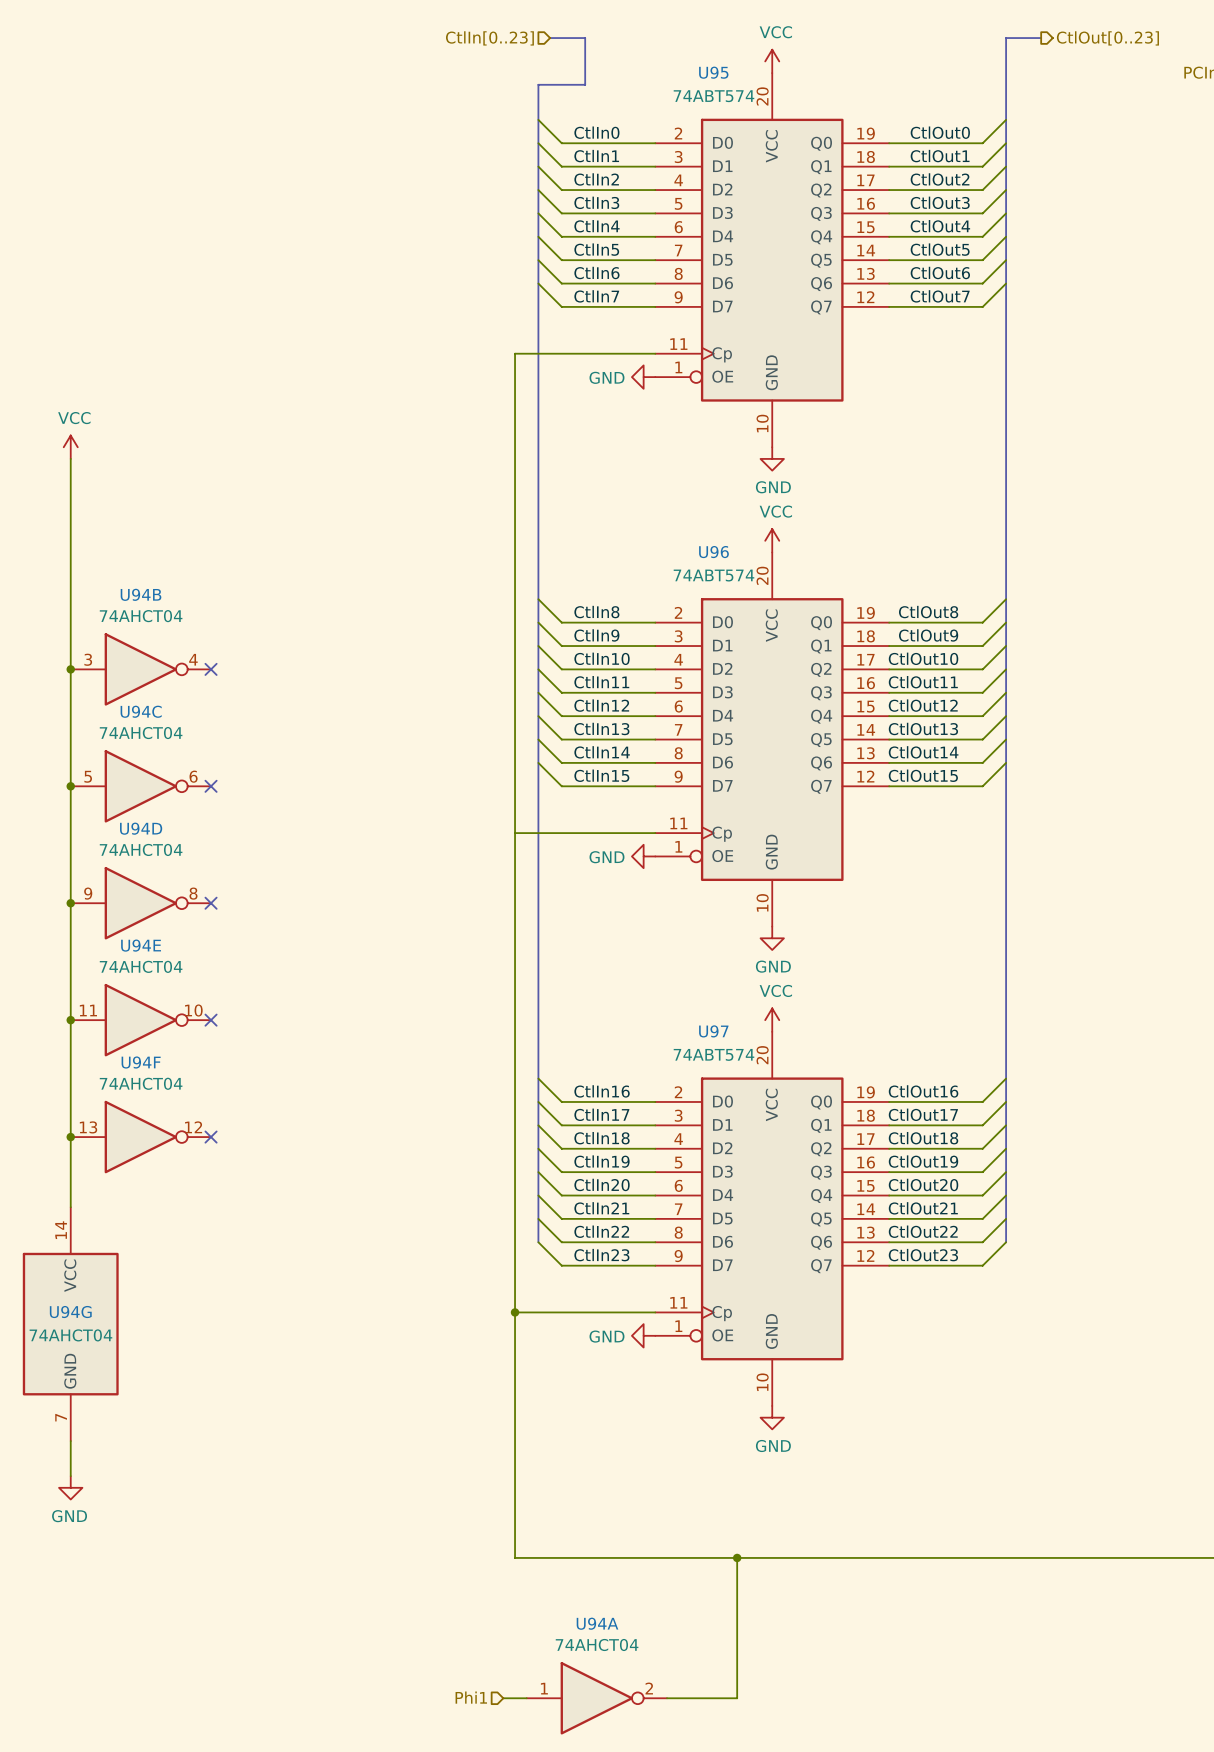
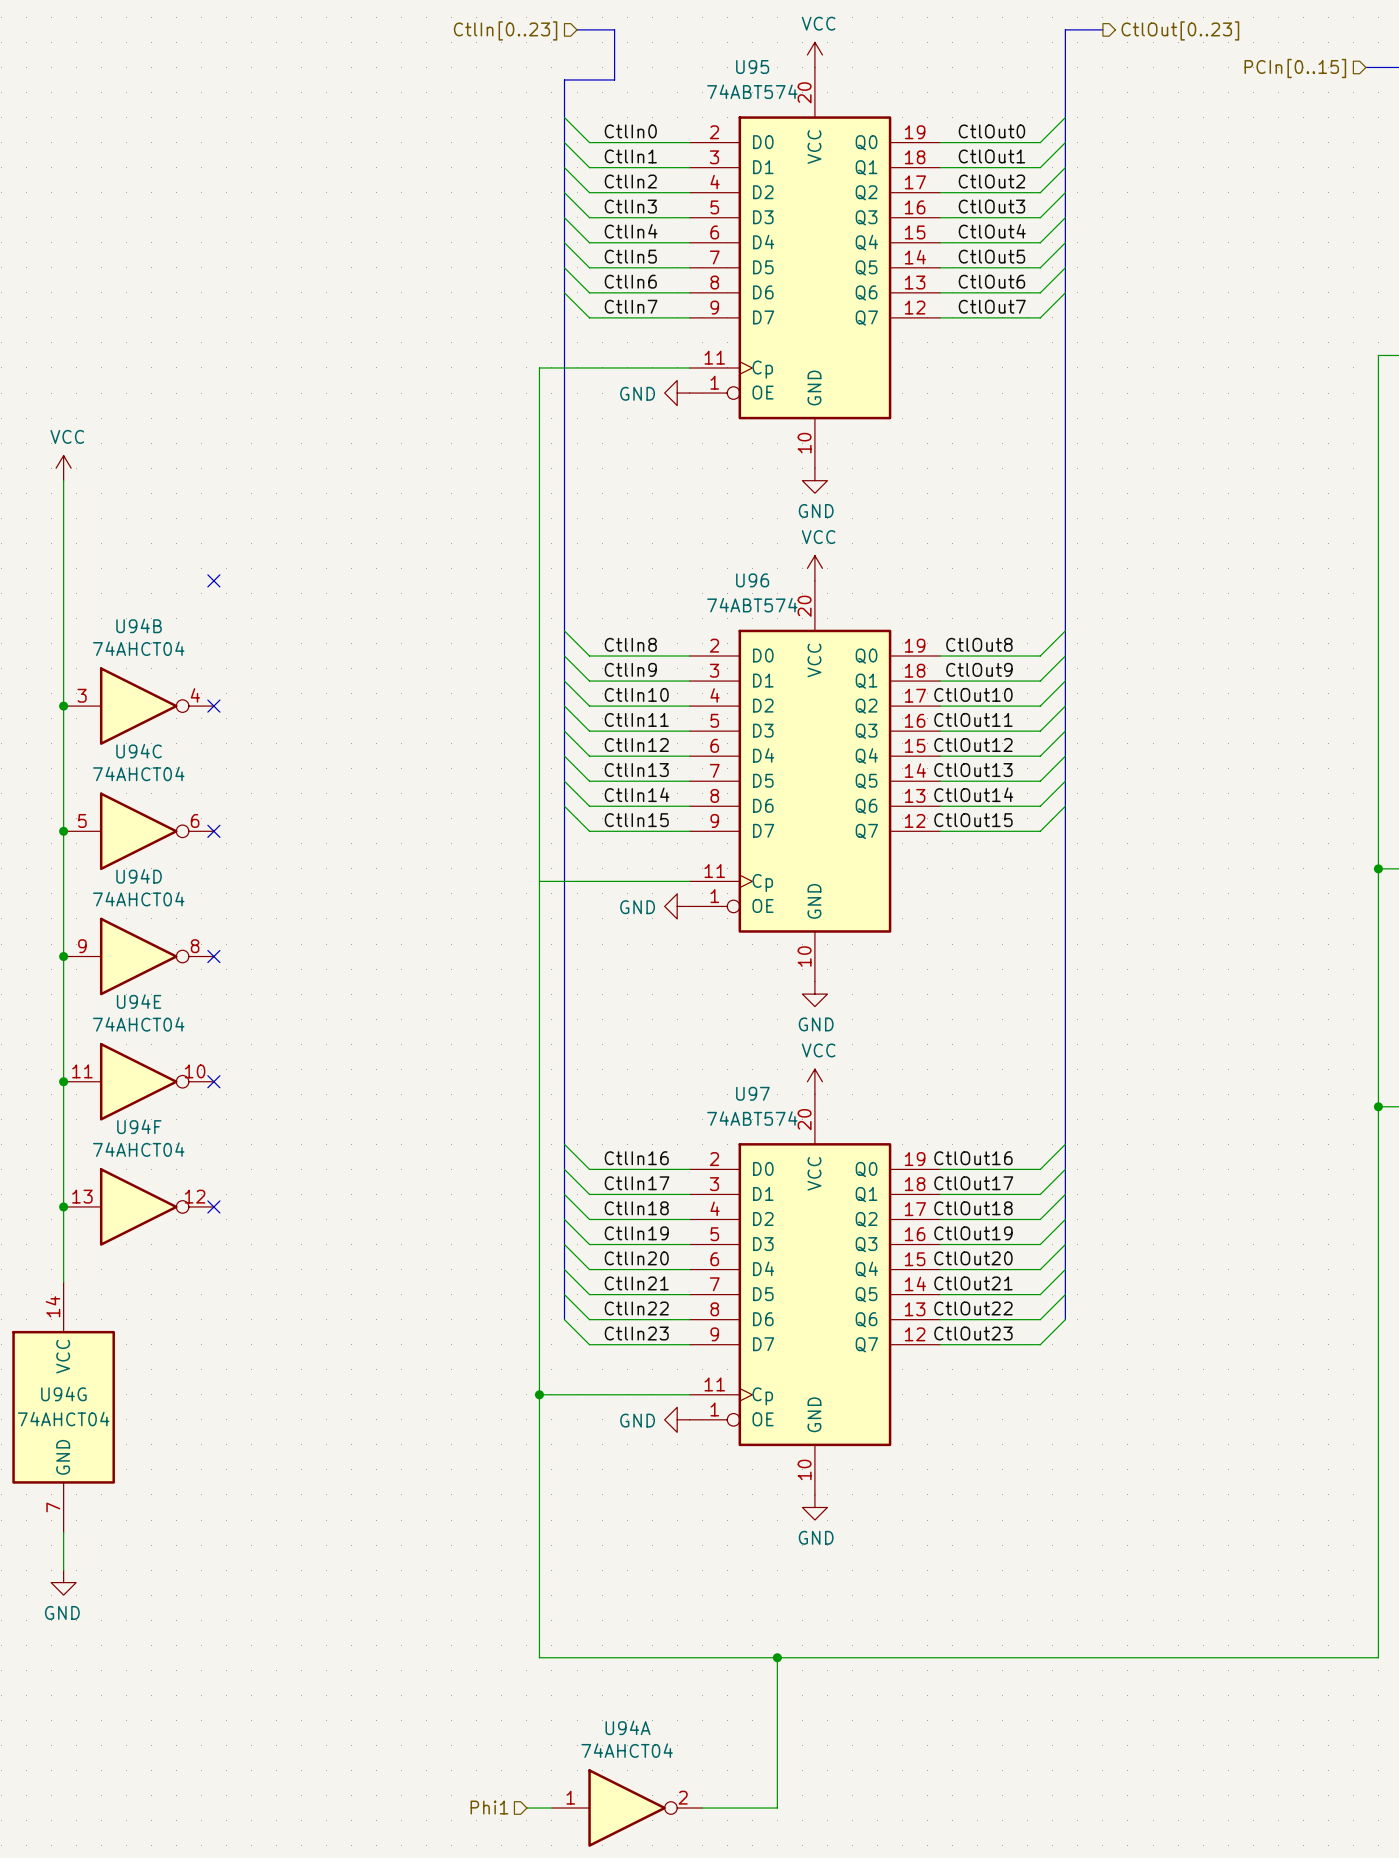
no-connect mark: none -> (213, 580)

